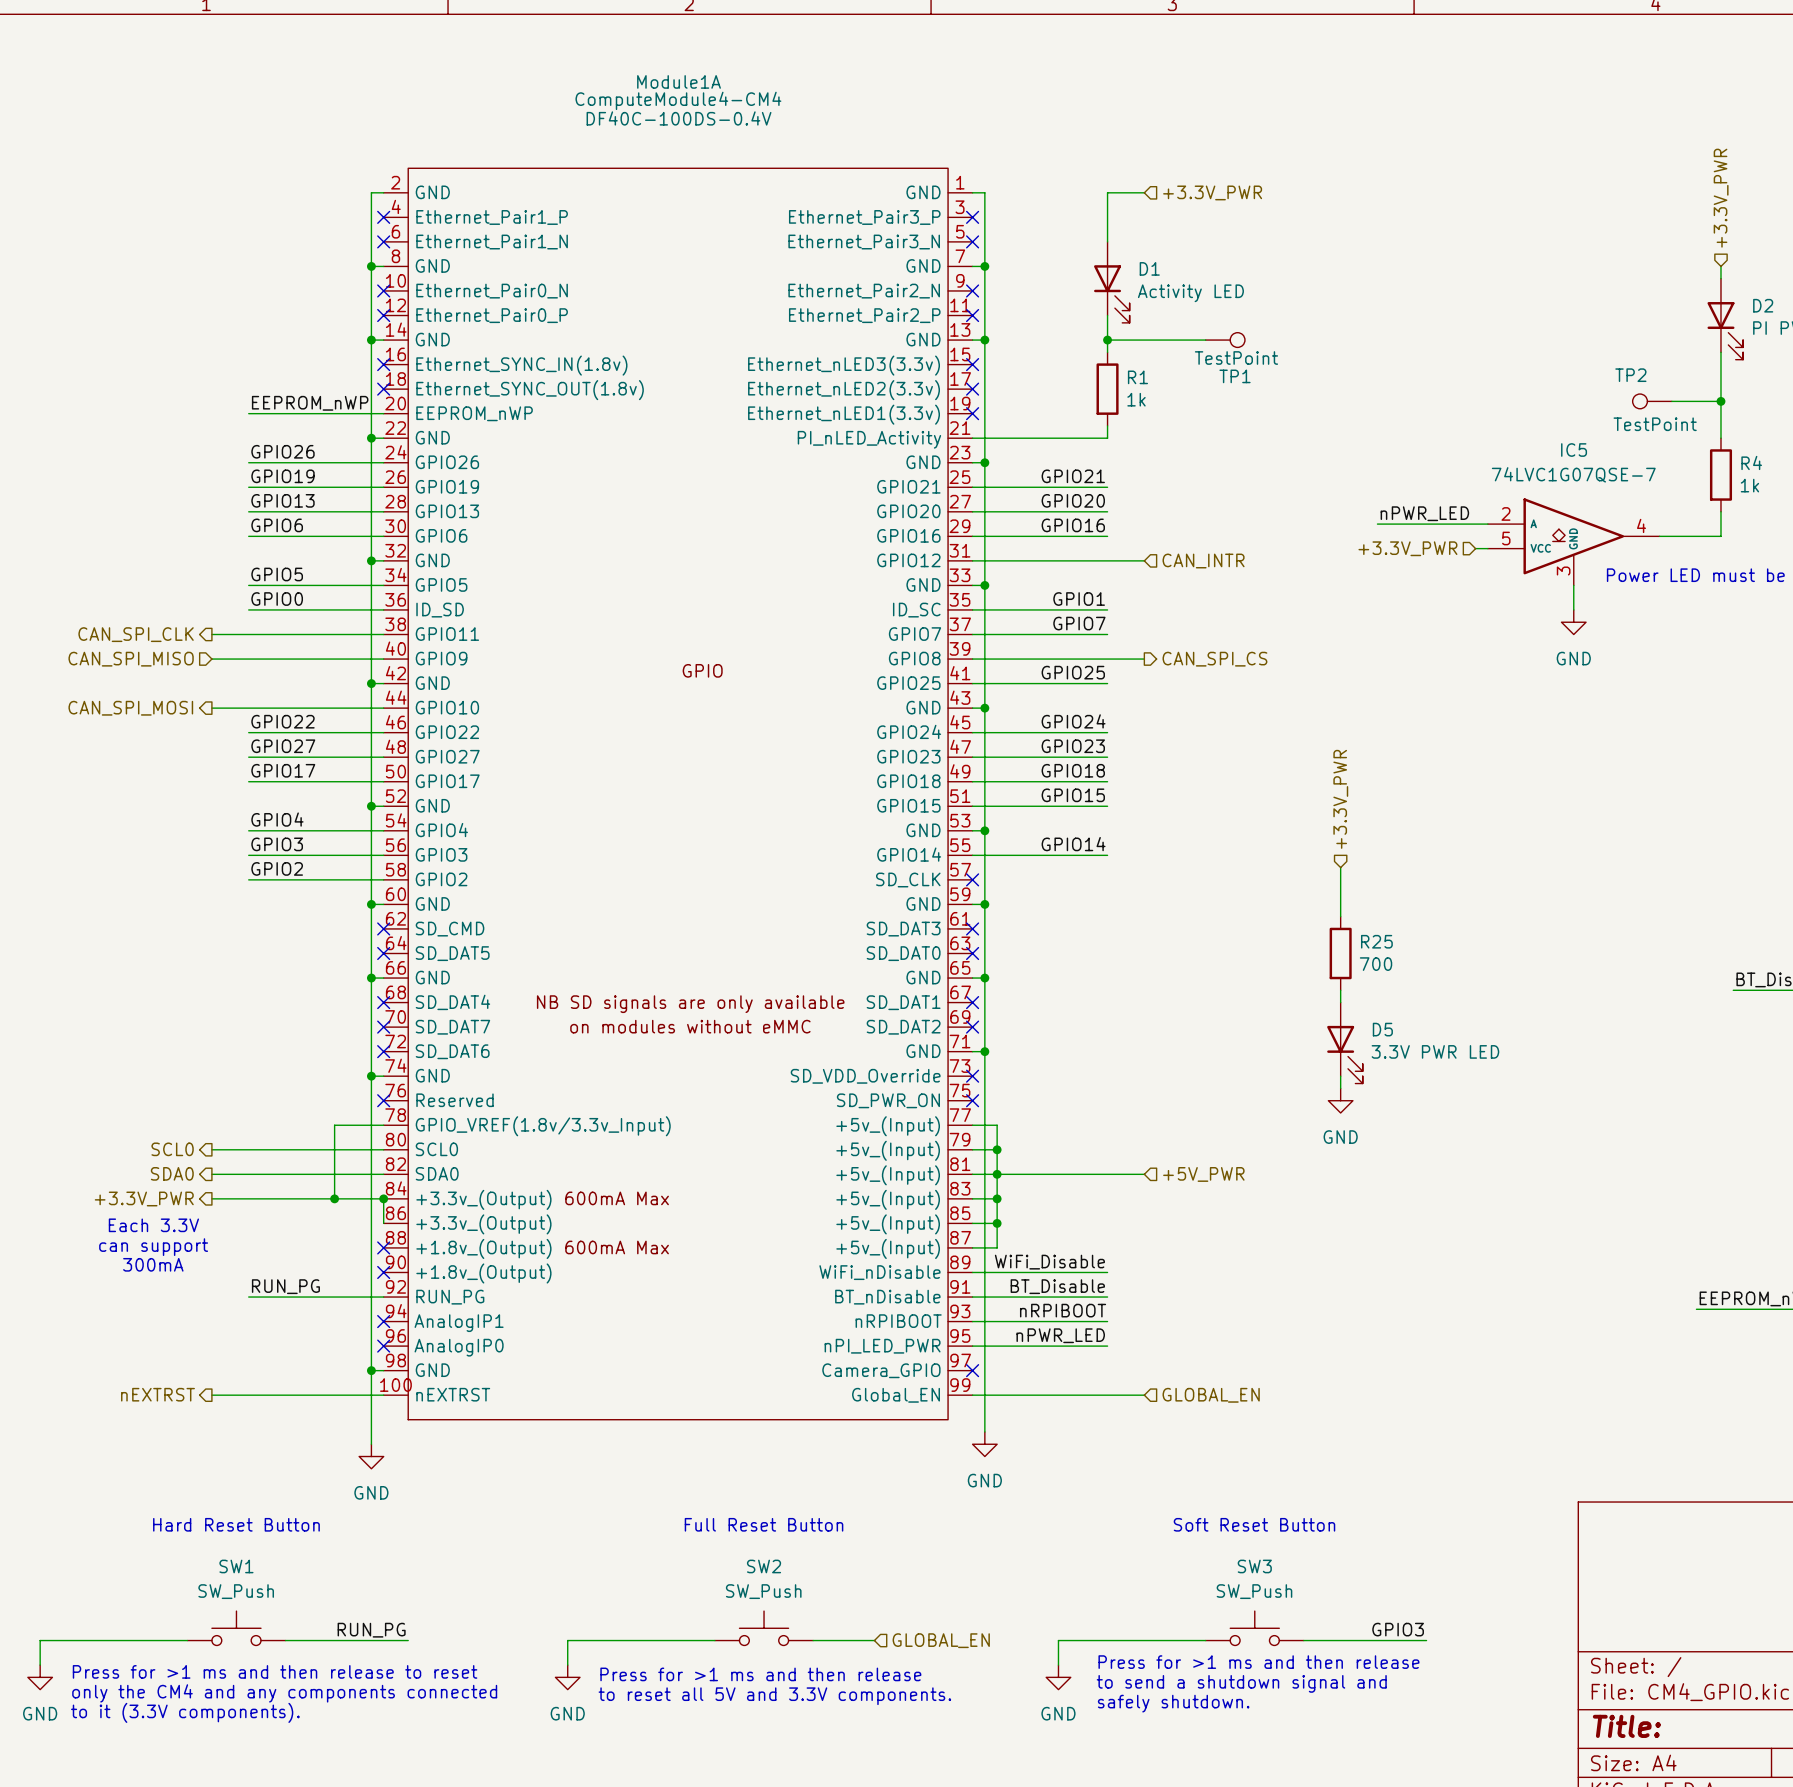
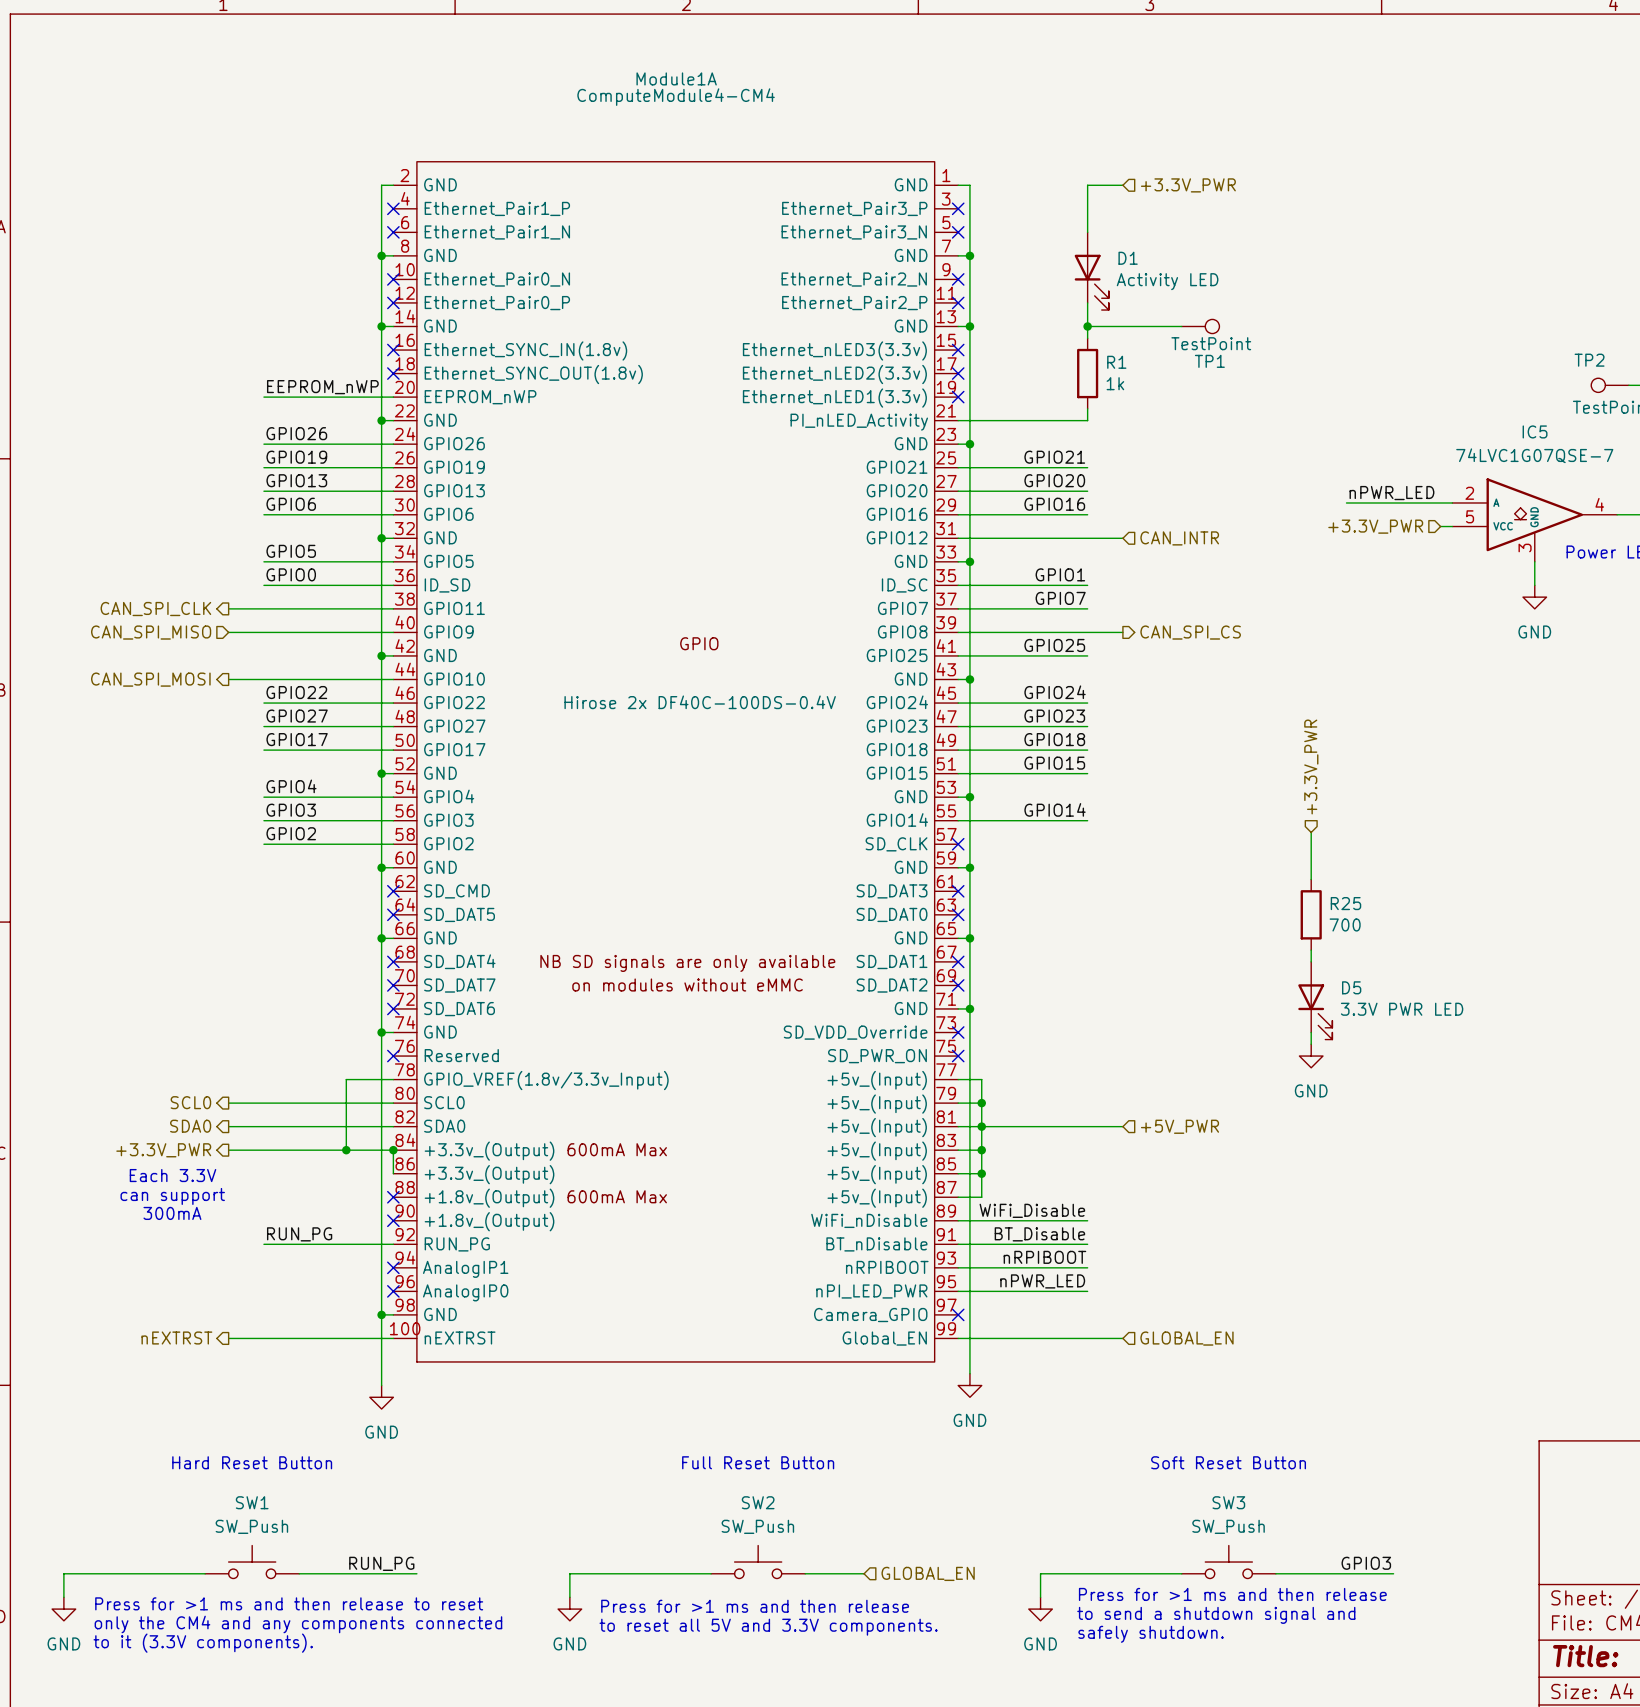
Module1A text: DF40C-100DS-0.4V (679, 118) -> none
Module1A text: none -> Hirose 2x DF40C-100DS-0.4V (700, 702)

